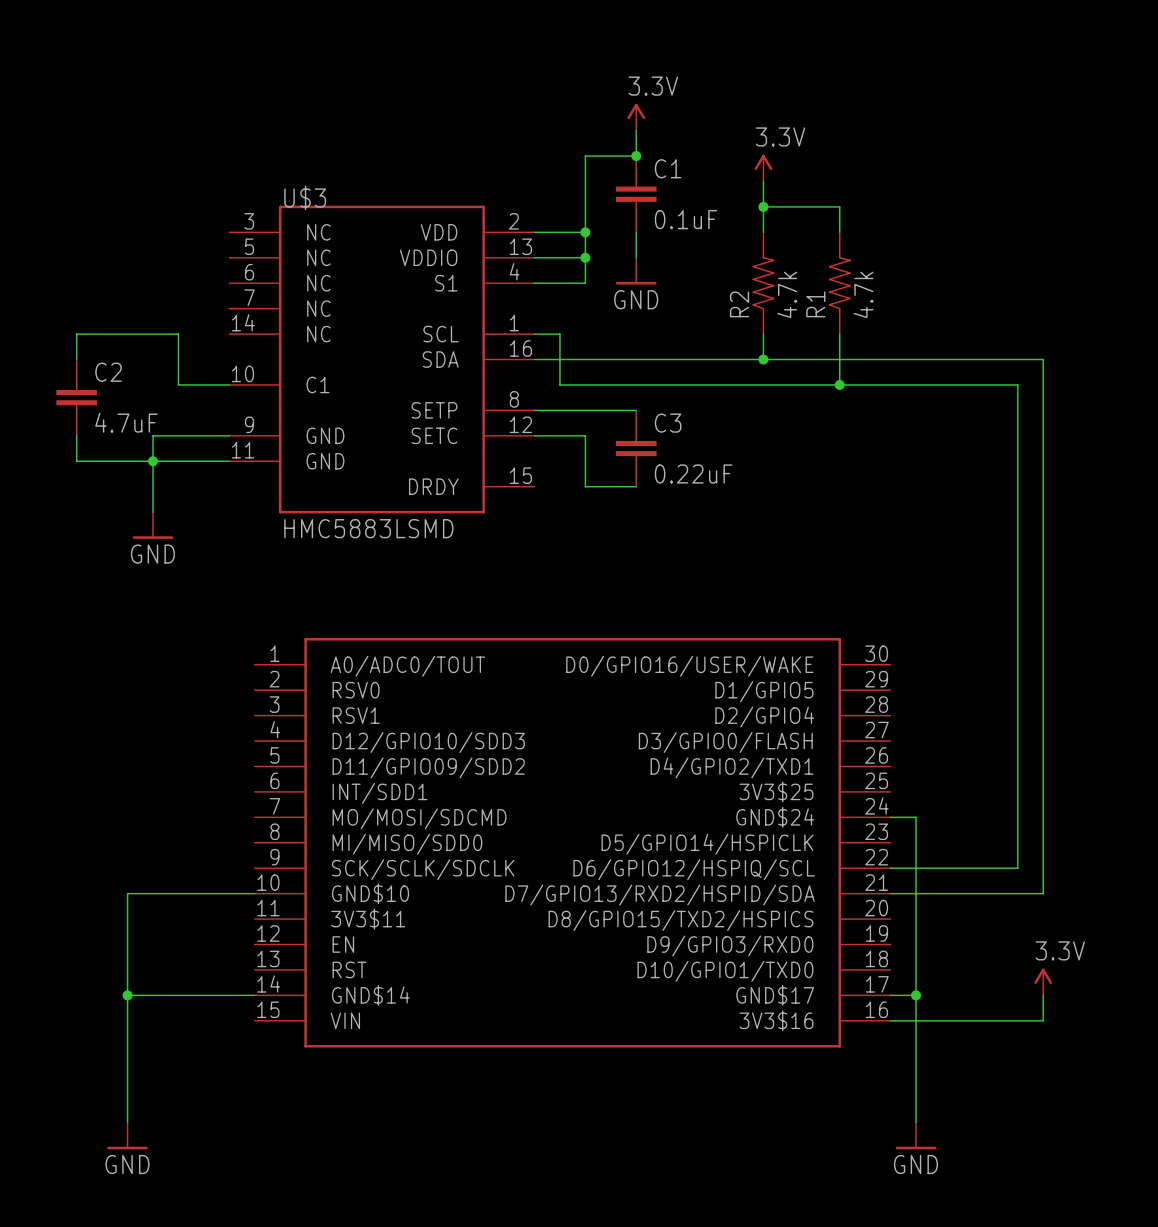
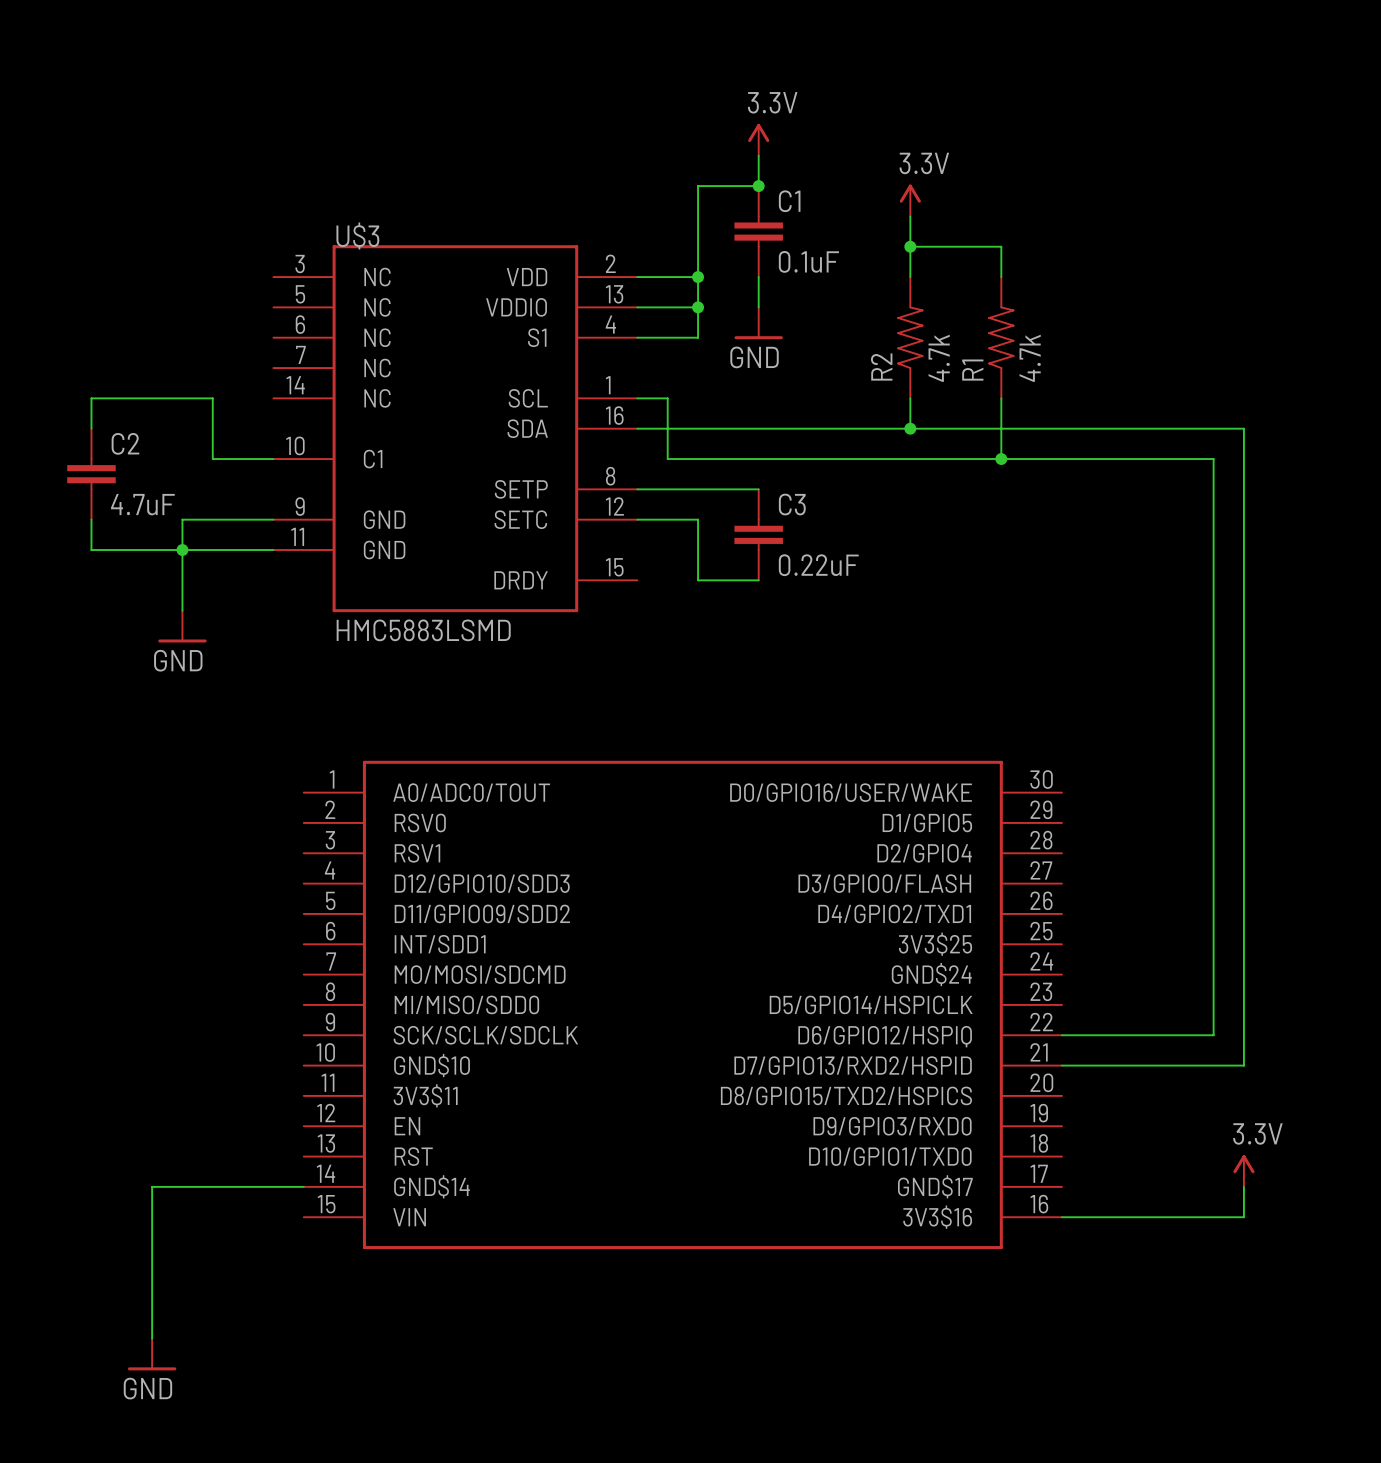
wire: (890, 817) (916, 817) (916, 1122) -> none
part pin name: D6/GPIO12/HSPIQ/SCL (694, 869) -> D6/GPIO12/HSPIQ (885, 1036)
wire: (254, 893) (127, 893) (127, 995) -> none
part pin name: D7/GPIO13/RXD2/HSPID/SDA (660, 895) -> D7/GPIO13/RXD2/HSPID (853, 1065)
junction: (127, 995) -> none
wire: (890, 995) (916, 995) -> none
junction: (916, 995) -> none
power symbol: GND (916, 1135) -> none

